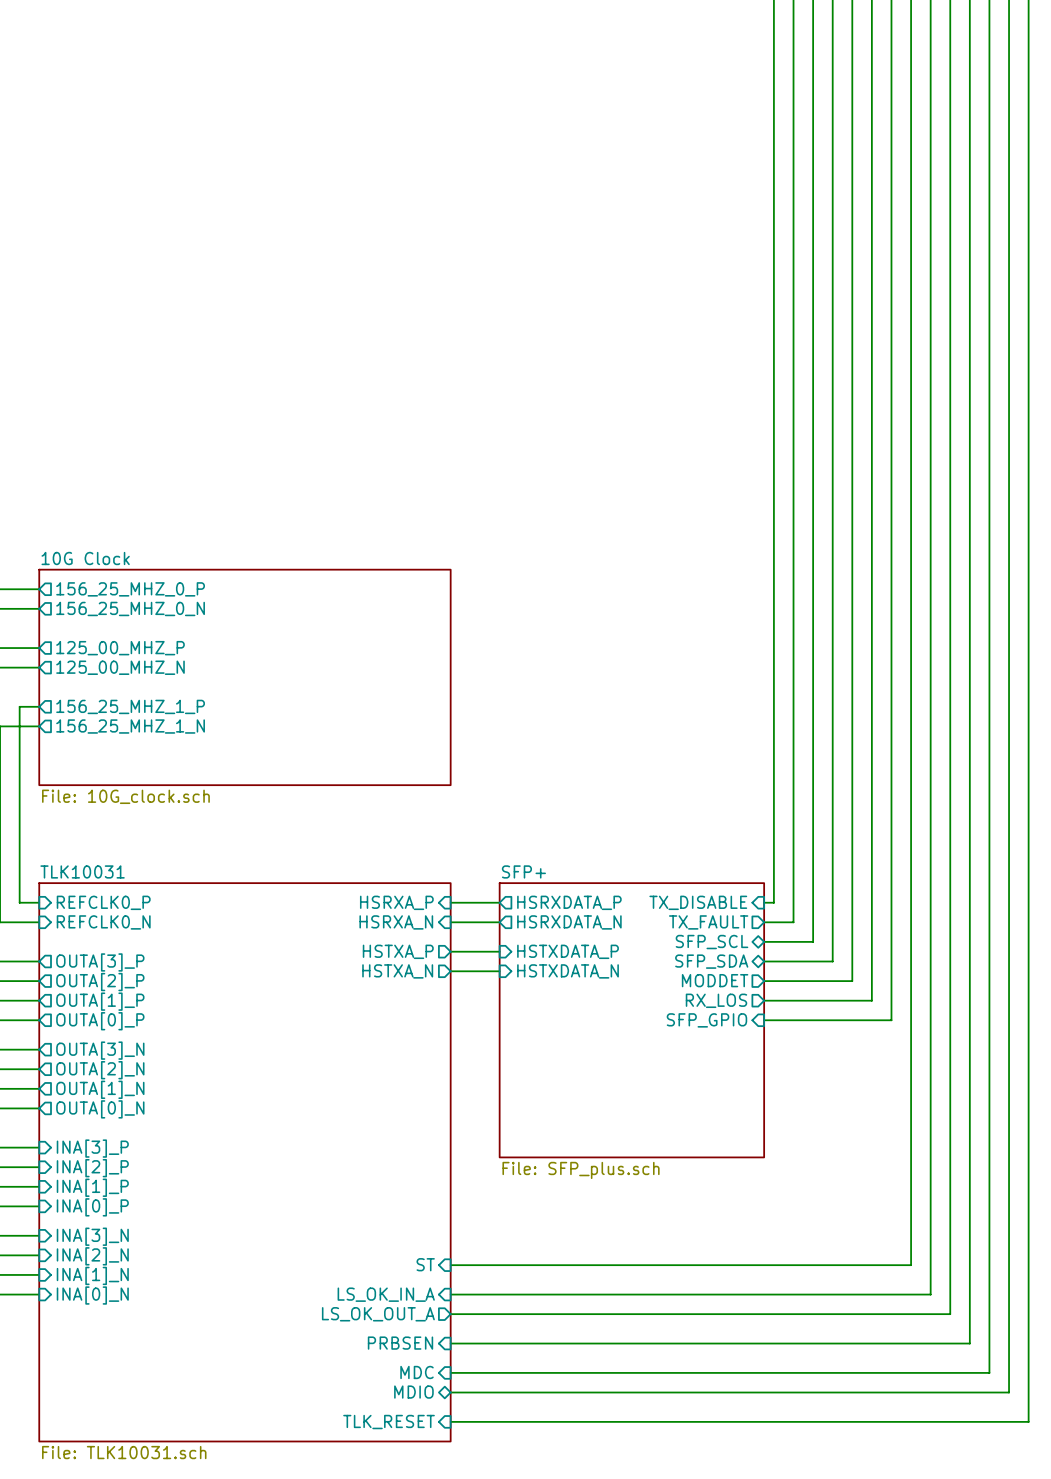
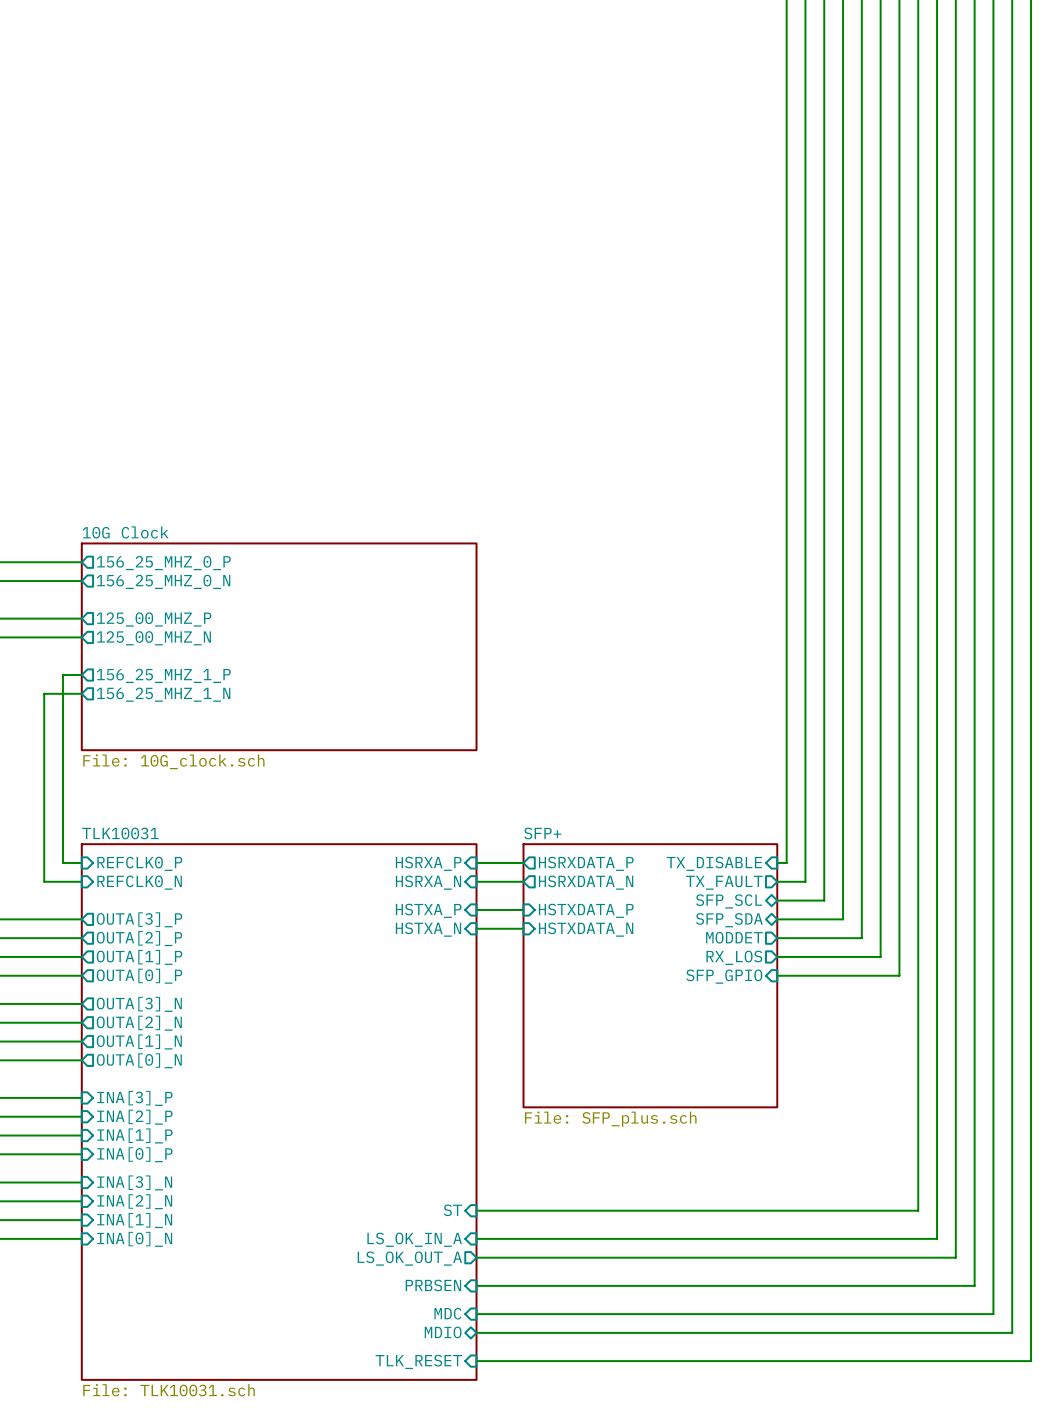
sheet pin shape: output (398, 951) -> input (428, 910)
sheet pin shape: output (397, 971) -> input (428, 929)

